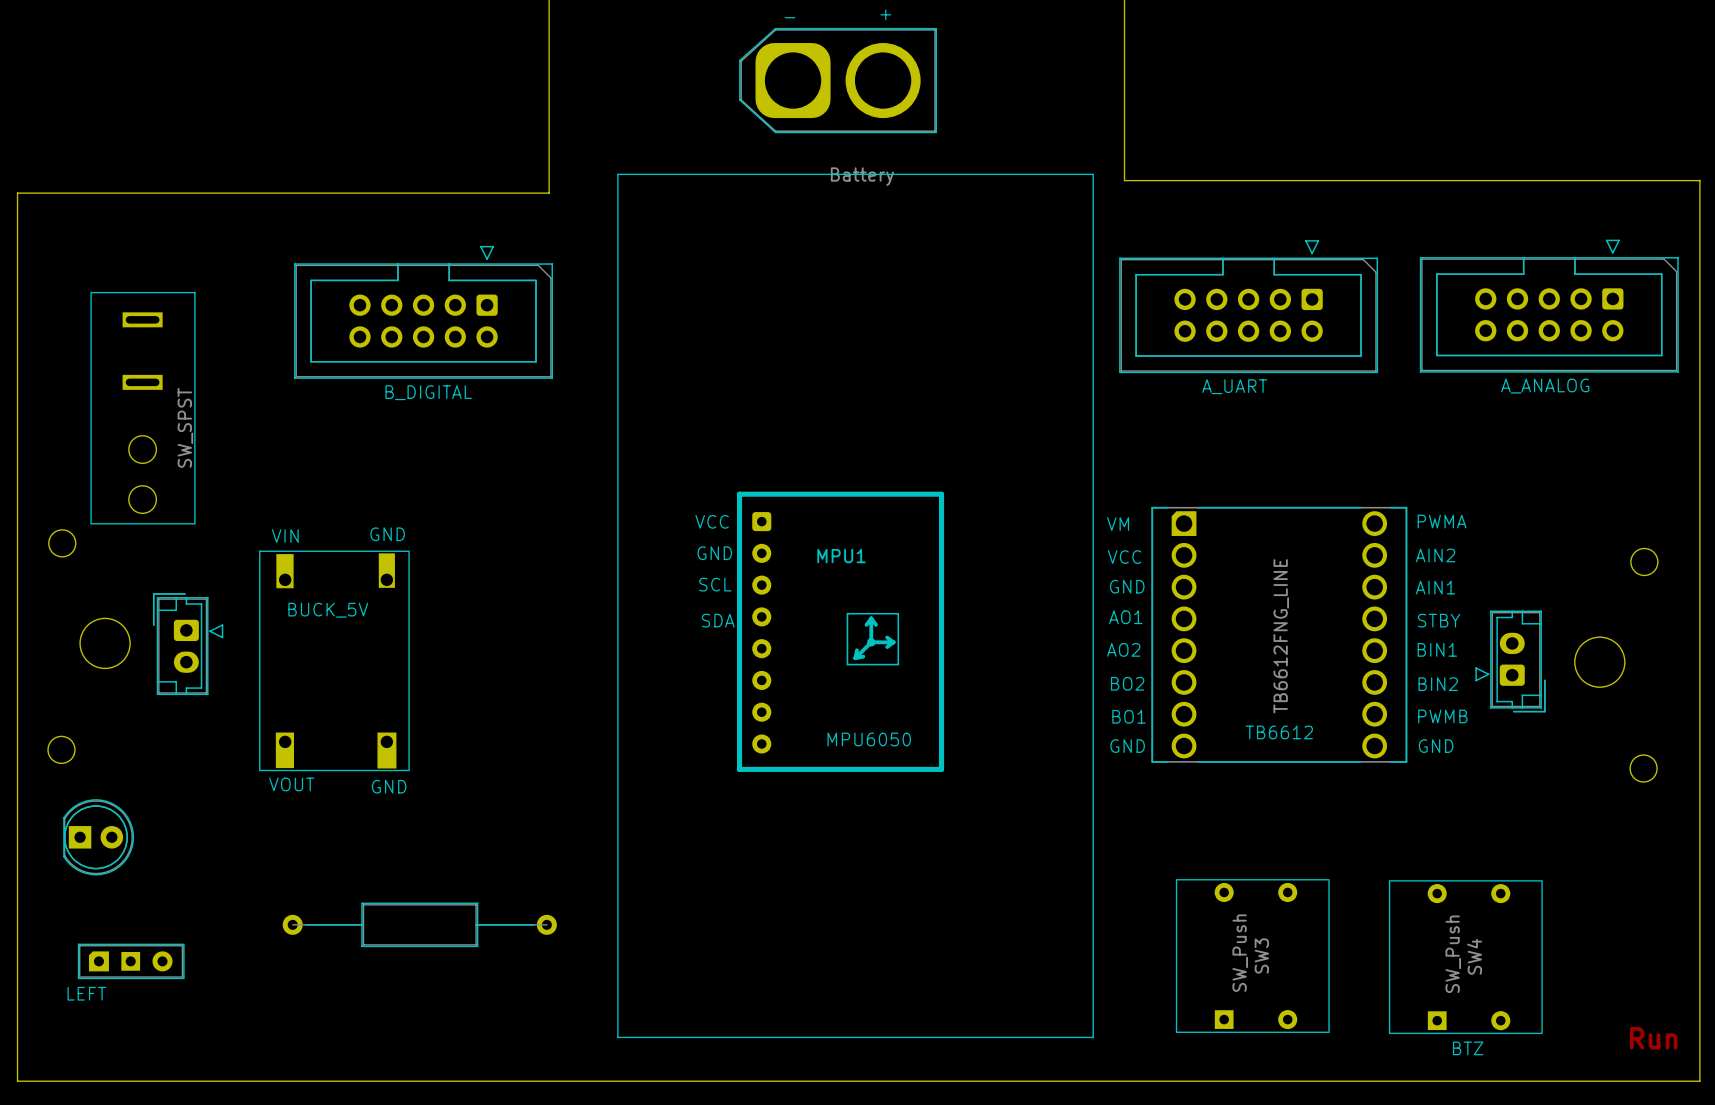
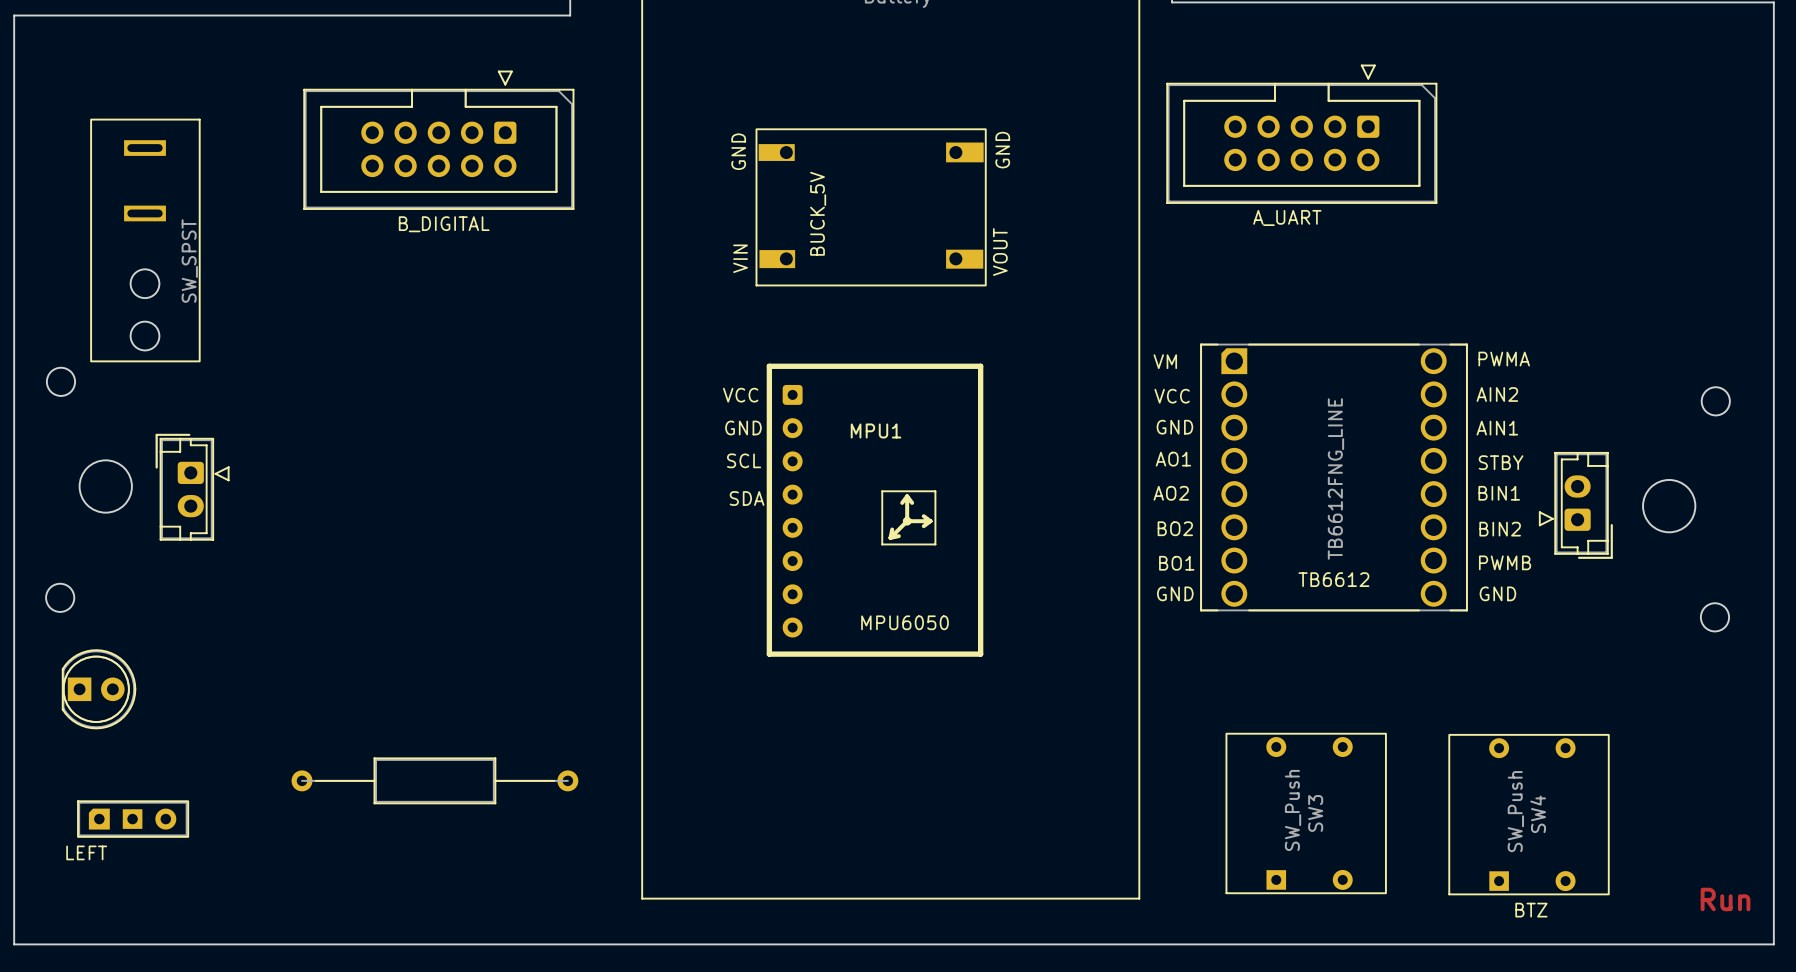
part: (1549, 306) -> none
part: none -> (871, 207)
MPU1 position: (840, 631) -> (875, 510)
part: (334, 660) -> none

